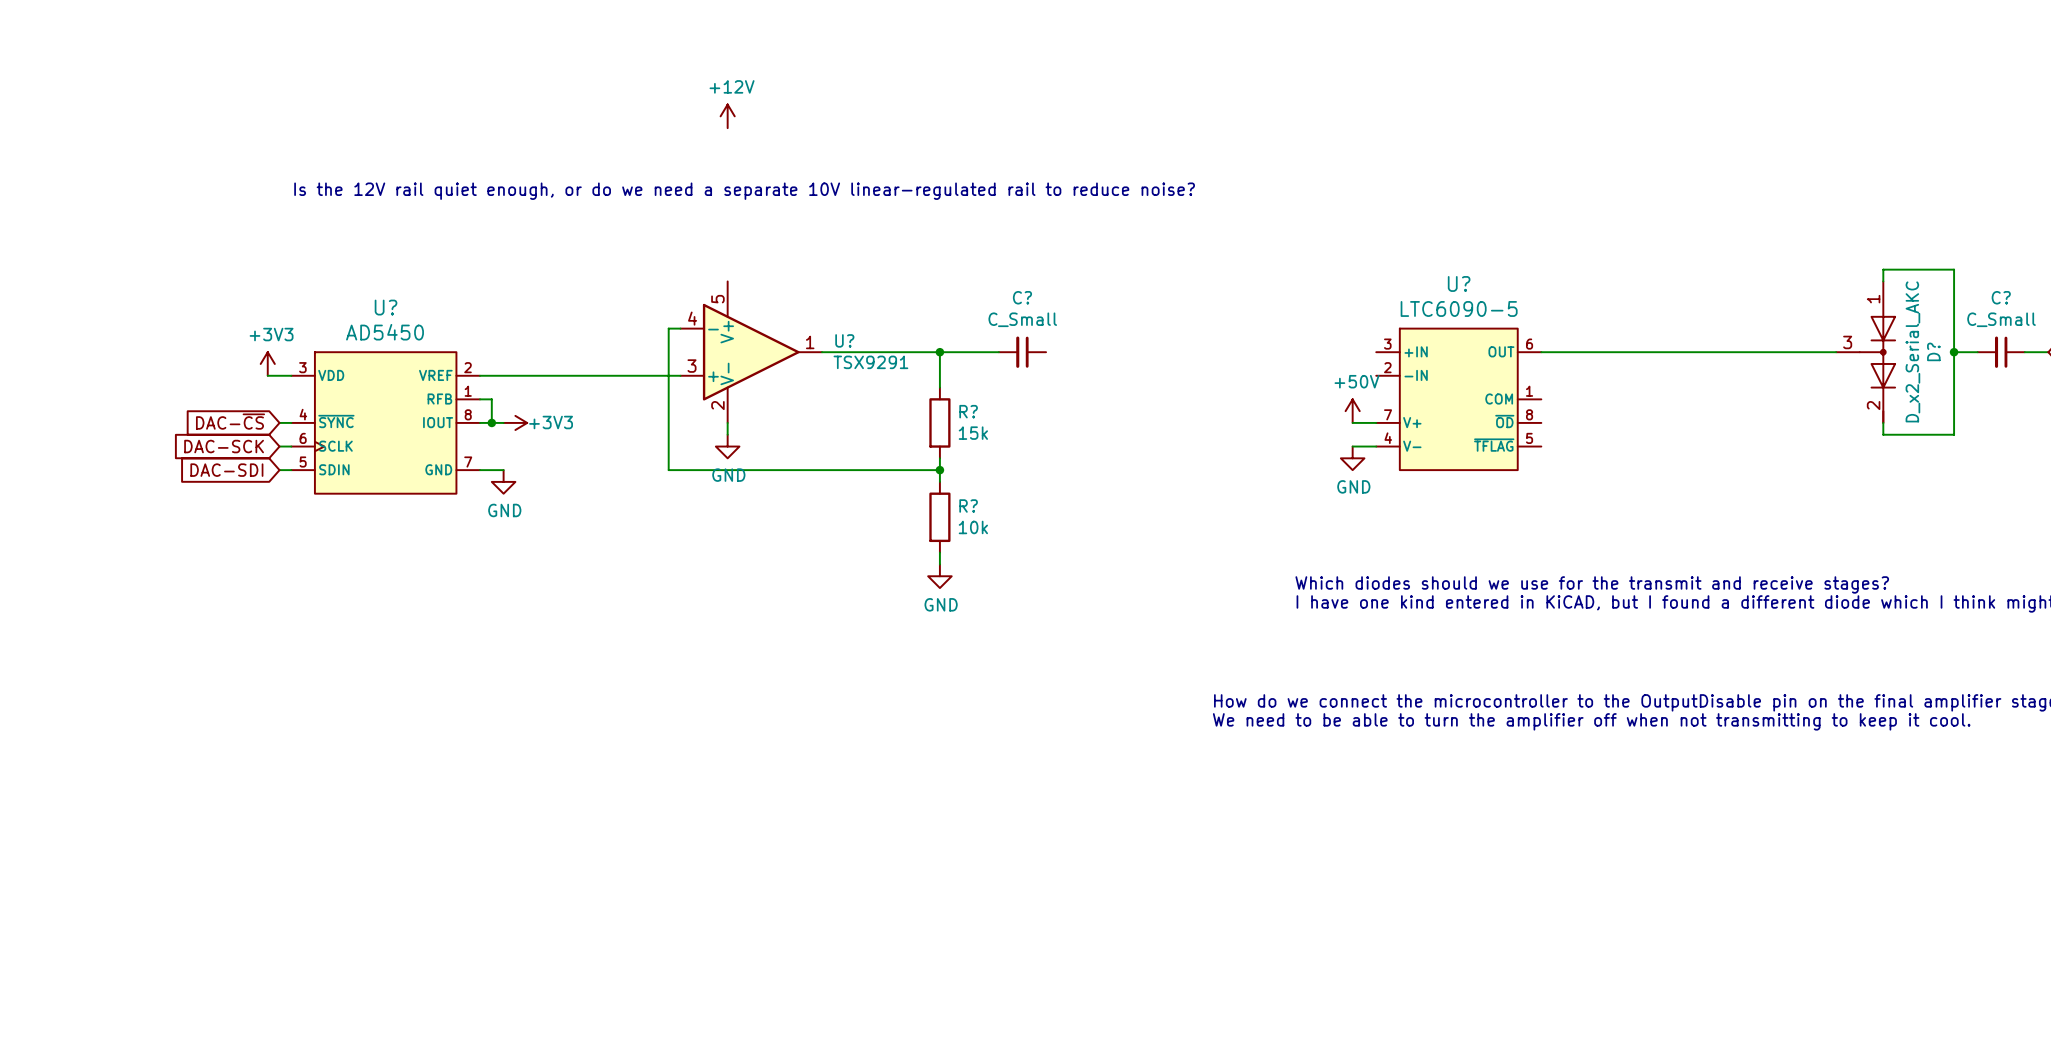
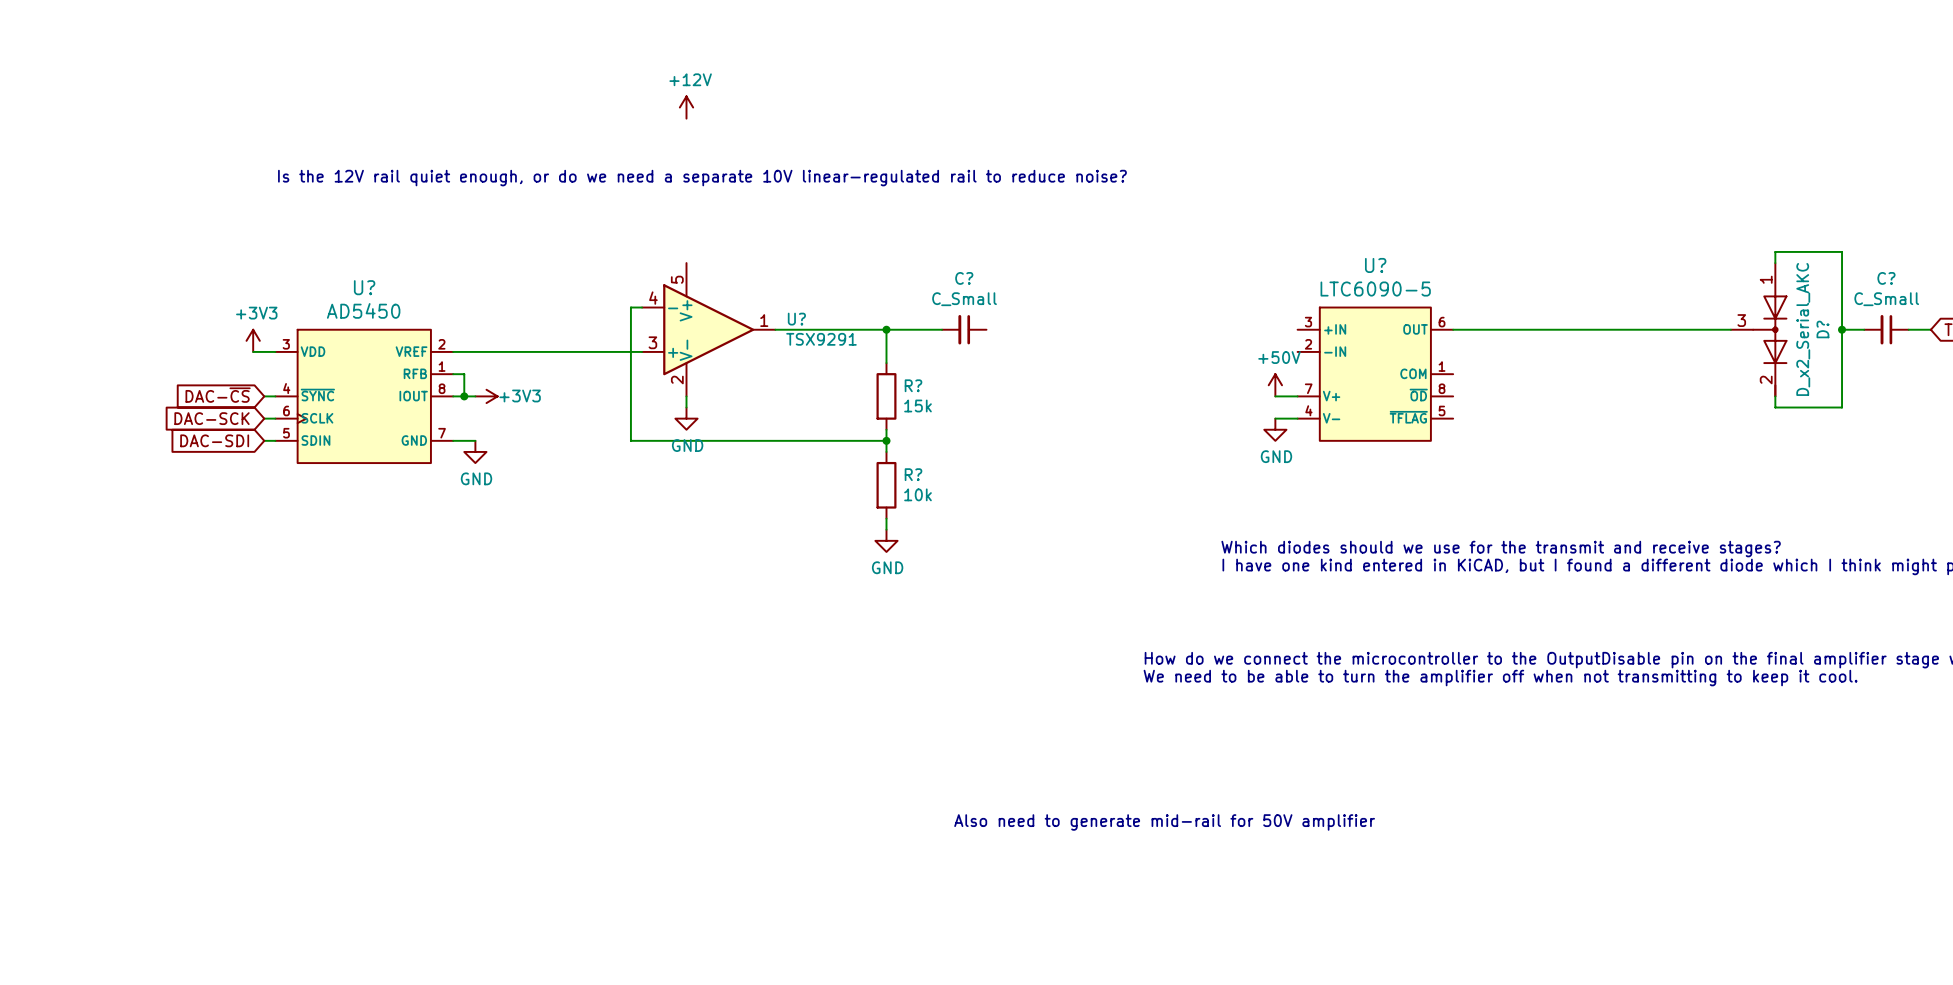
text: none -> Also need to generate mid-rail for 50V amplifier (1164, 822)

